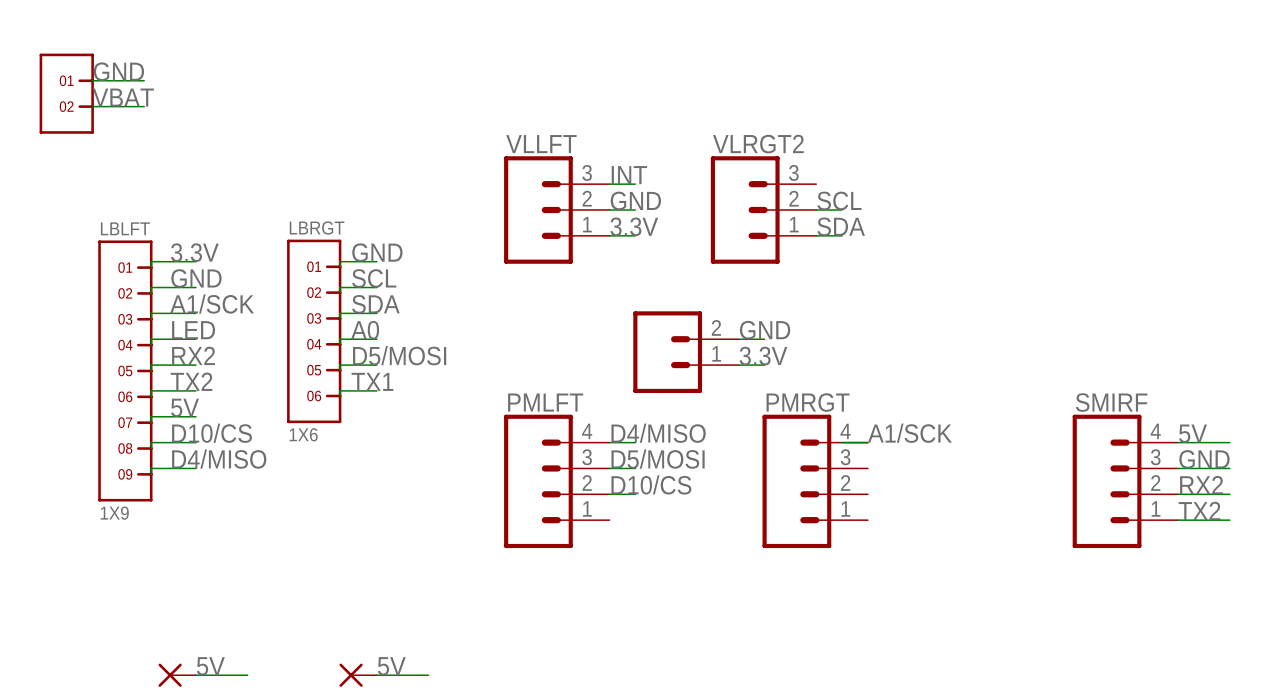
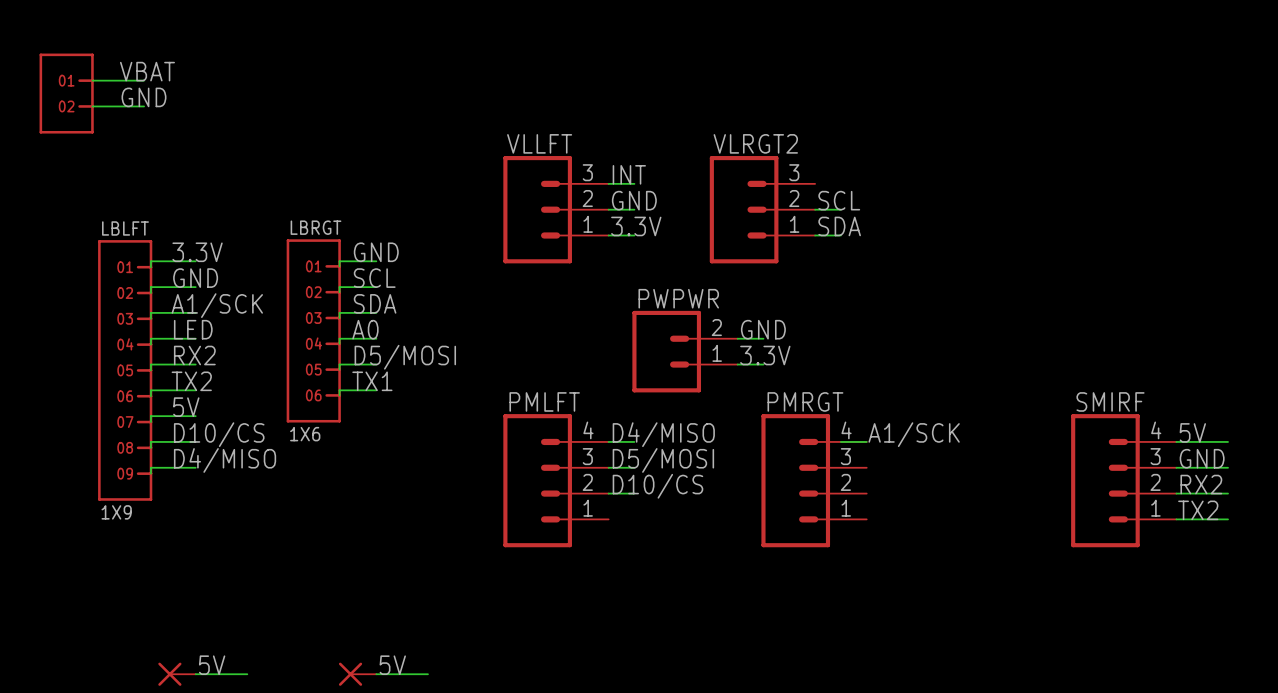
label position: GND (118, 71) -> GND (143, 97)
label position: VBAT (123, 97) -> VBAT (147, 71)
PWPWR name: none -> PWPWR (678, 298)

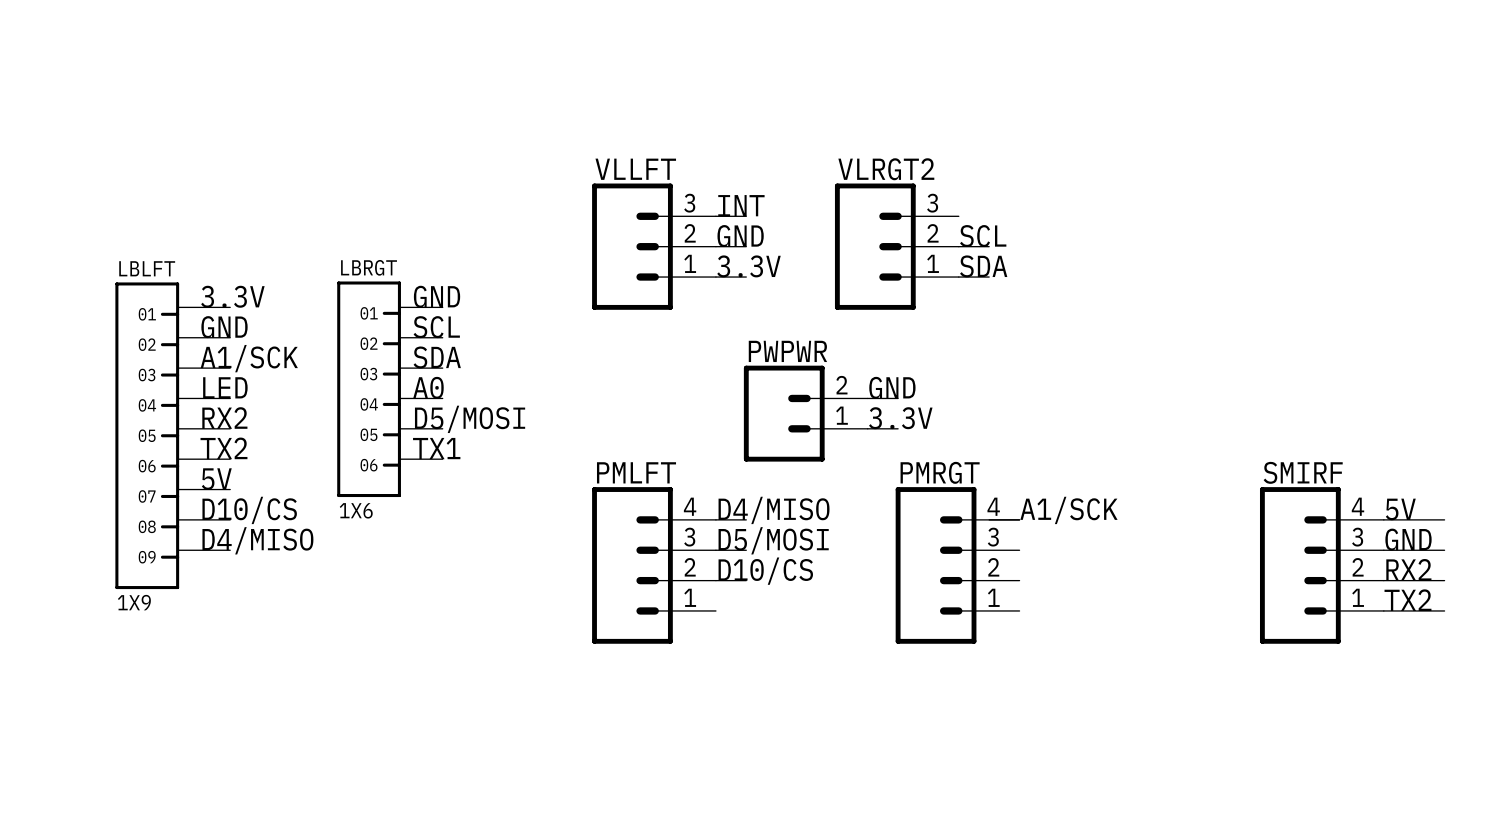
label: VBAT (147, 71) -> none
wire: (92, 80) (144, 80) -> none
part: (66, 93) -> none
label: GND (143, 97) -> none
wire: (92, 106) (144, 106) -> none
label: 5V (212, 665) -> none
label: 5V (392, 665) -> none
part: (176, 674) -> none
wire: (195, 674) (247, 674) -> none
part: (357, 674) -> none
wire: (376, 674) (427, 674) -> none

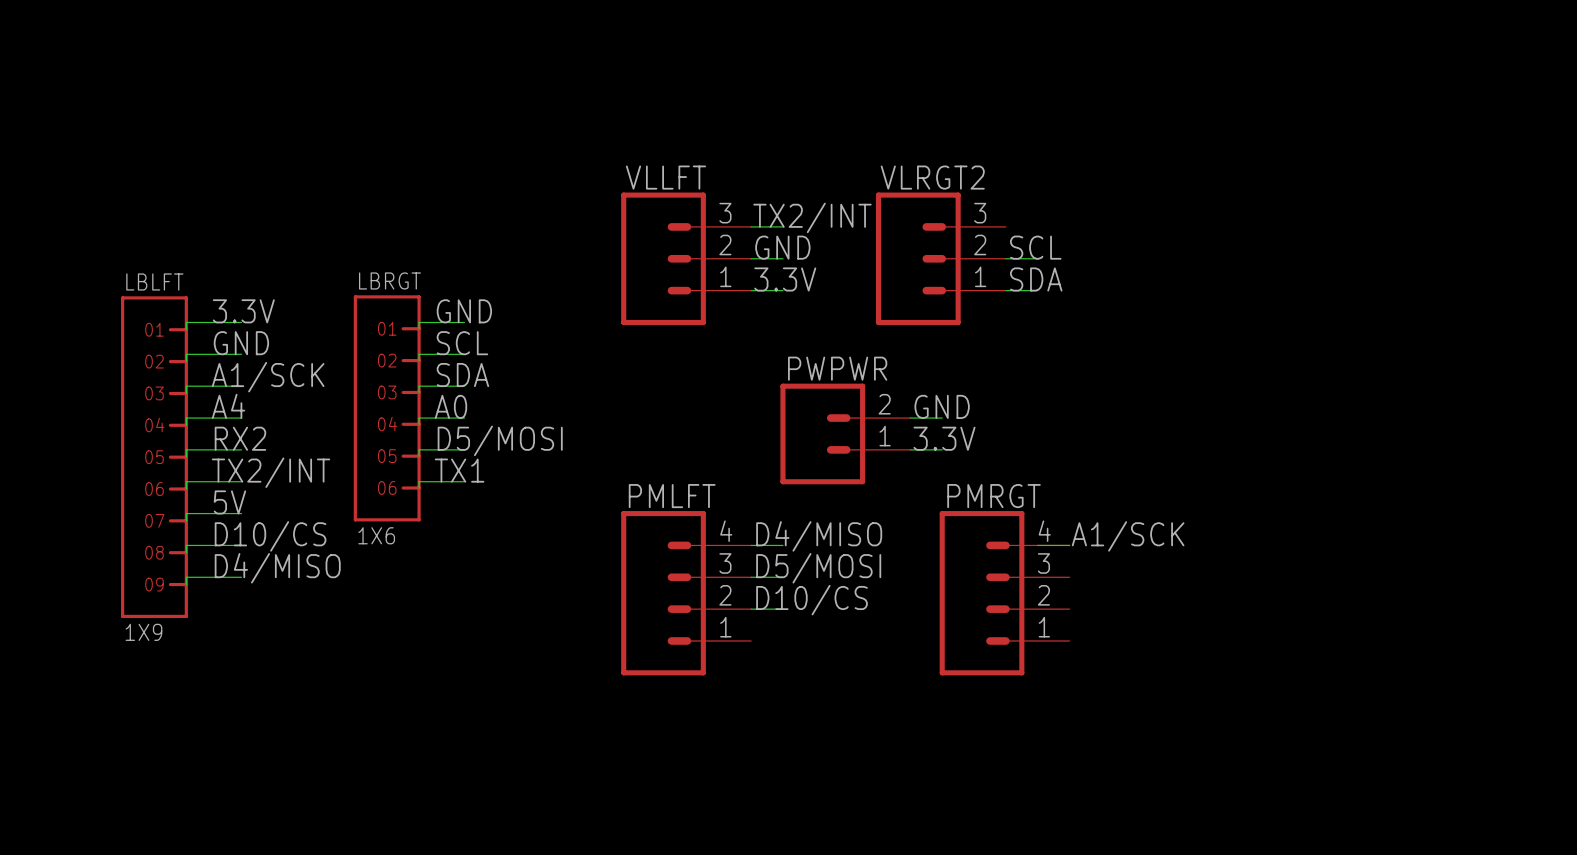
label: INT (741, 205) -> TX2/INT (812, 217)
label: LED (225, 387) -> A4 (228, 406)
label: TX2 (223, 448) -> TX2/INT (271, 472)
label: 5V (1400, 509) -> none
wire: (1383, 519) (1444, 519) -> none
label: GND (1408, 539) -> none
wire: (1383, 550) (1444, 550) -> none
SMIRF: (1321, 565) -> none
label: RX2 (1408, 569) -> none
wire: (1383, 580) (1444, 580) -> none
label: TX2 (1407, 600) -> none
wire: (1383, 610) (1444, 610) -> none

